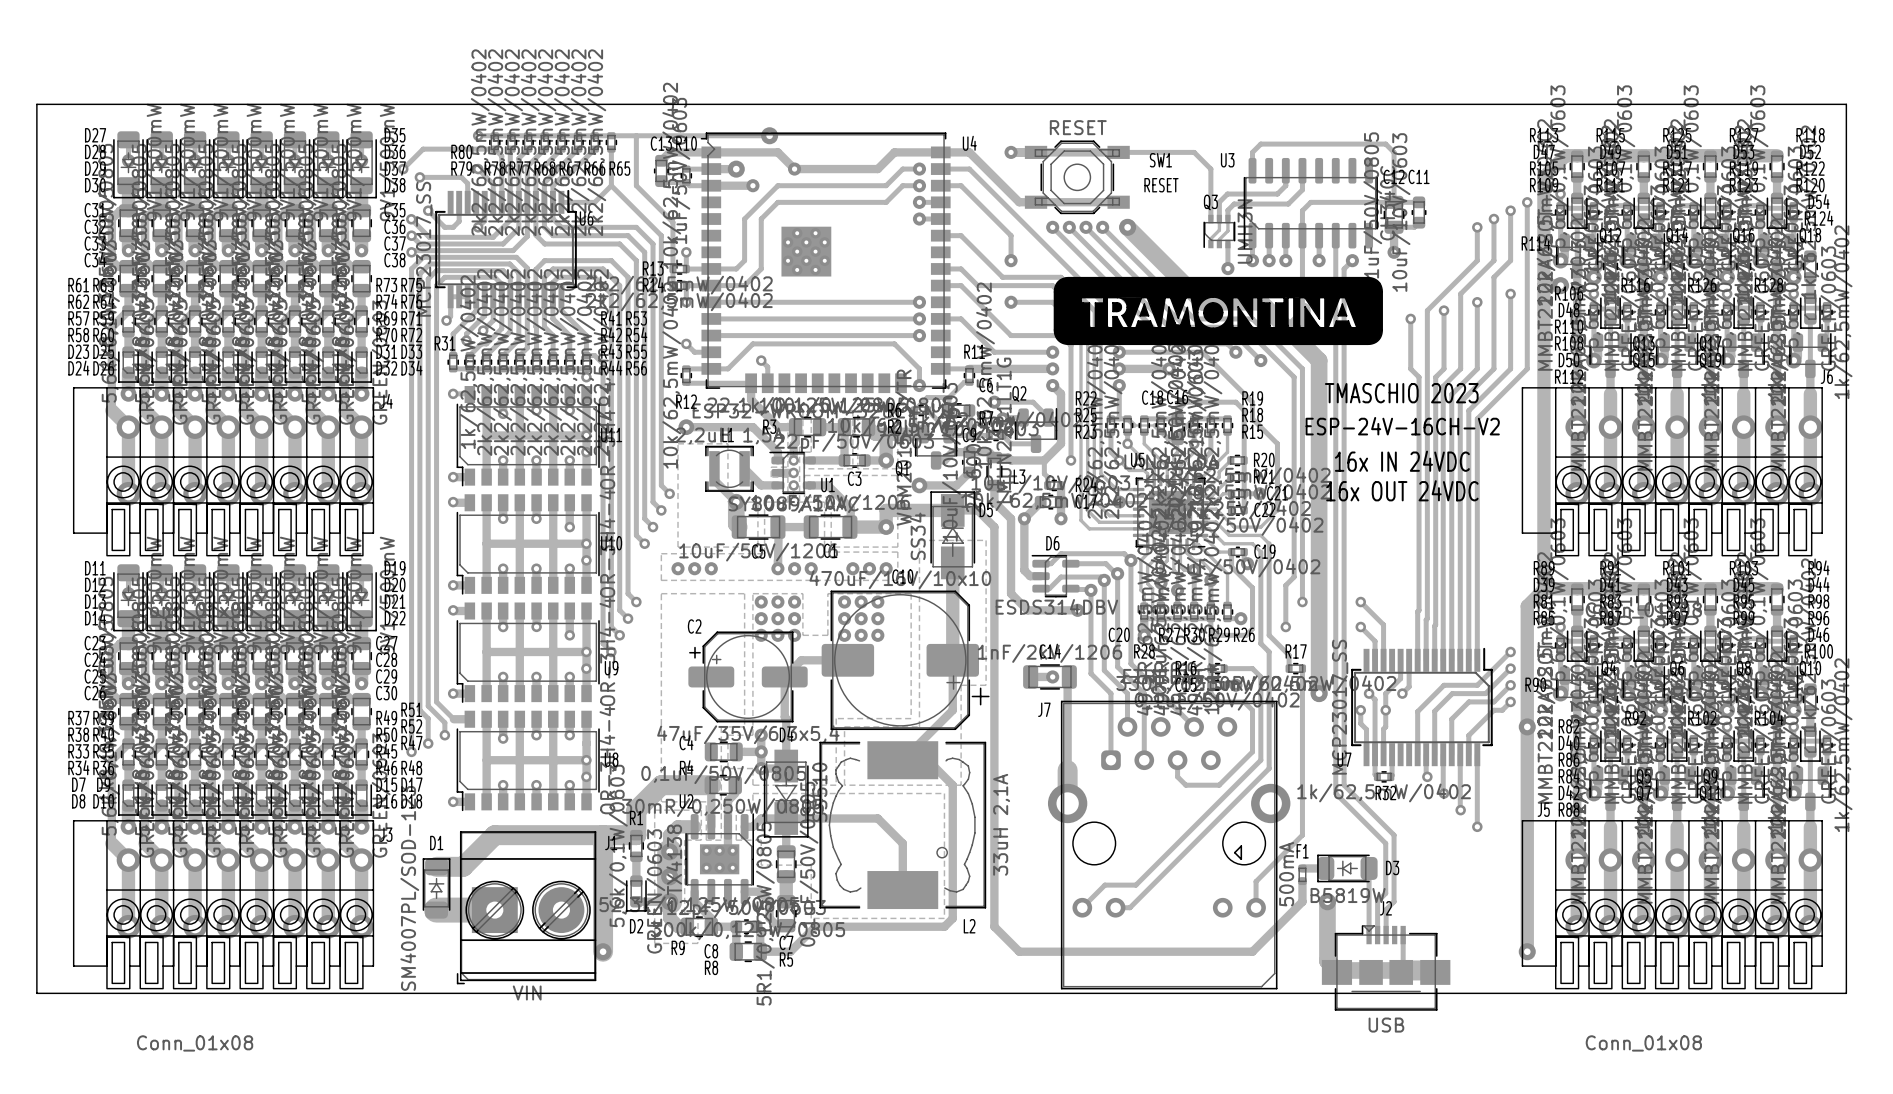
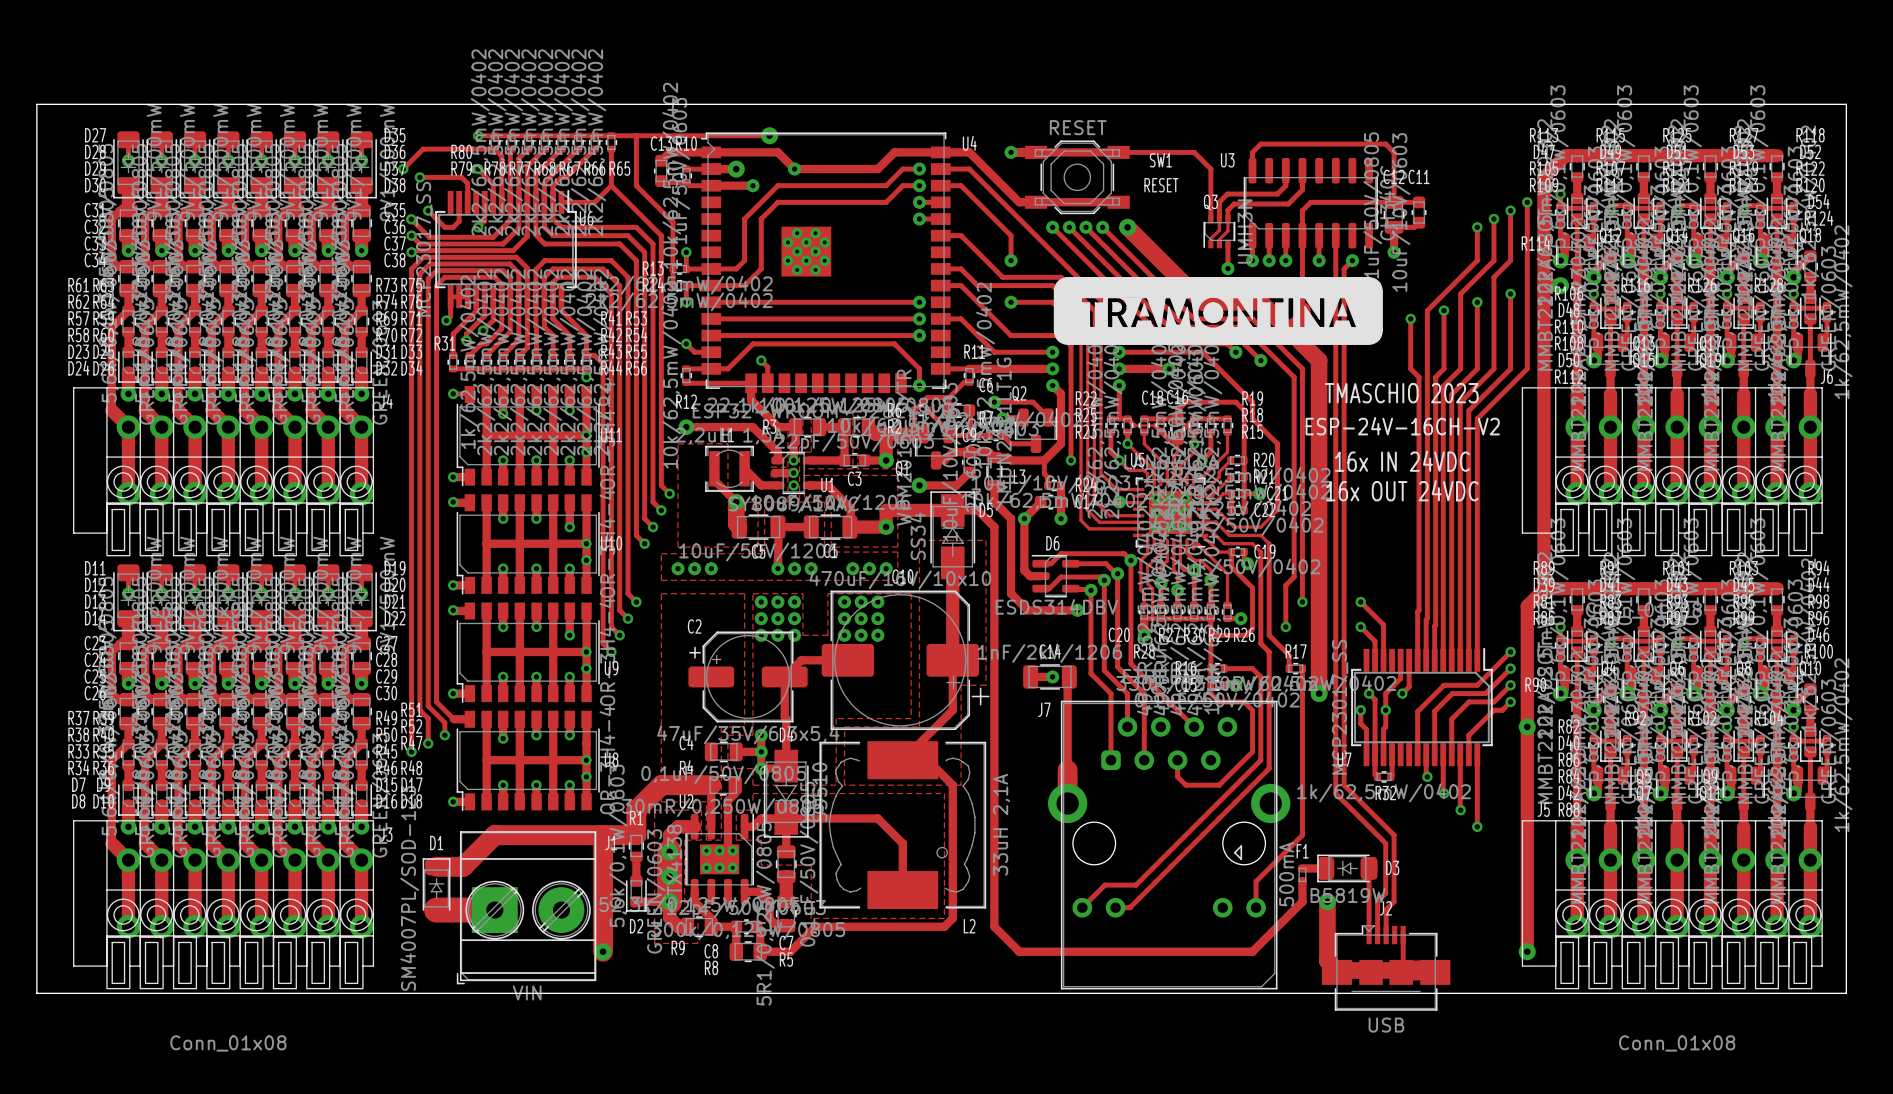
J3 value position: Conn_01x08 (195, 1043) -> Conn_01x08 (228, 1043)
J5 value position: Conn_01x08 (1643, 1043) -> Conn_01x08 (1677, 1043)

